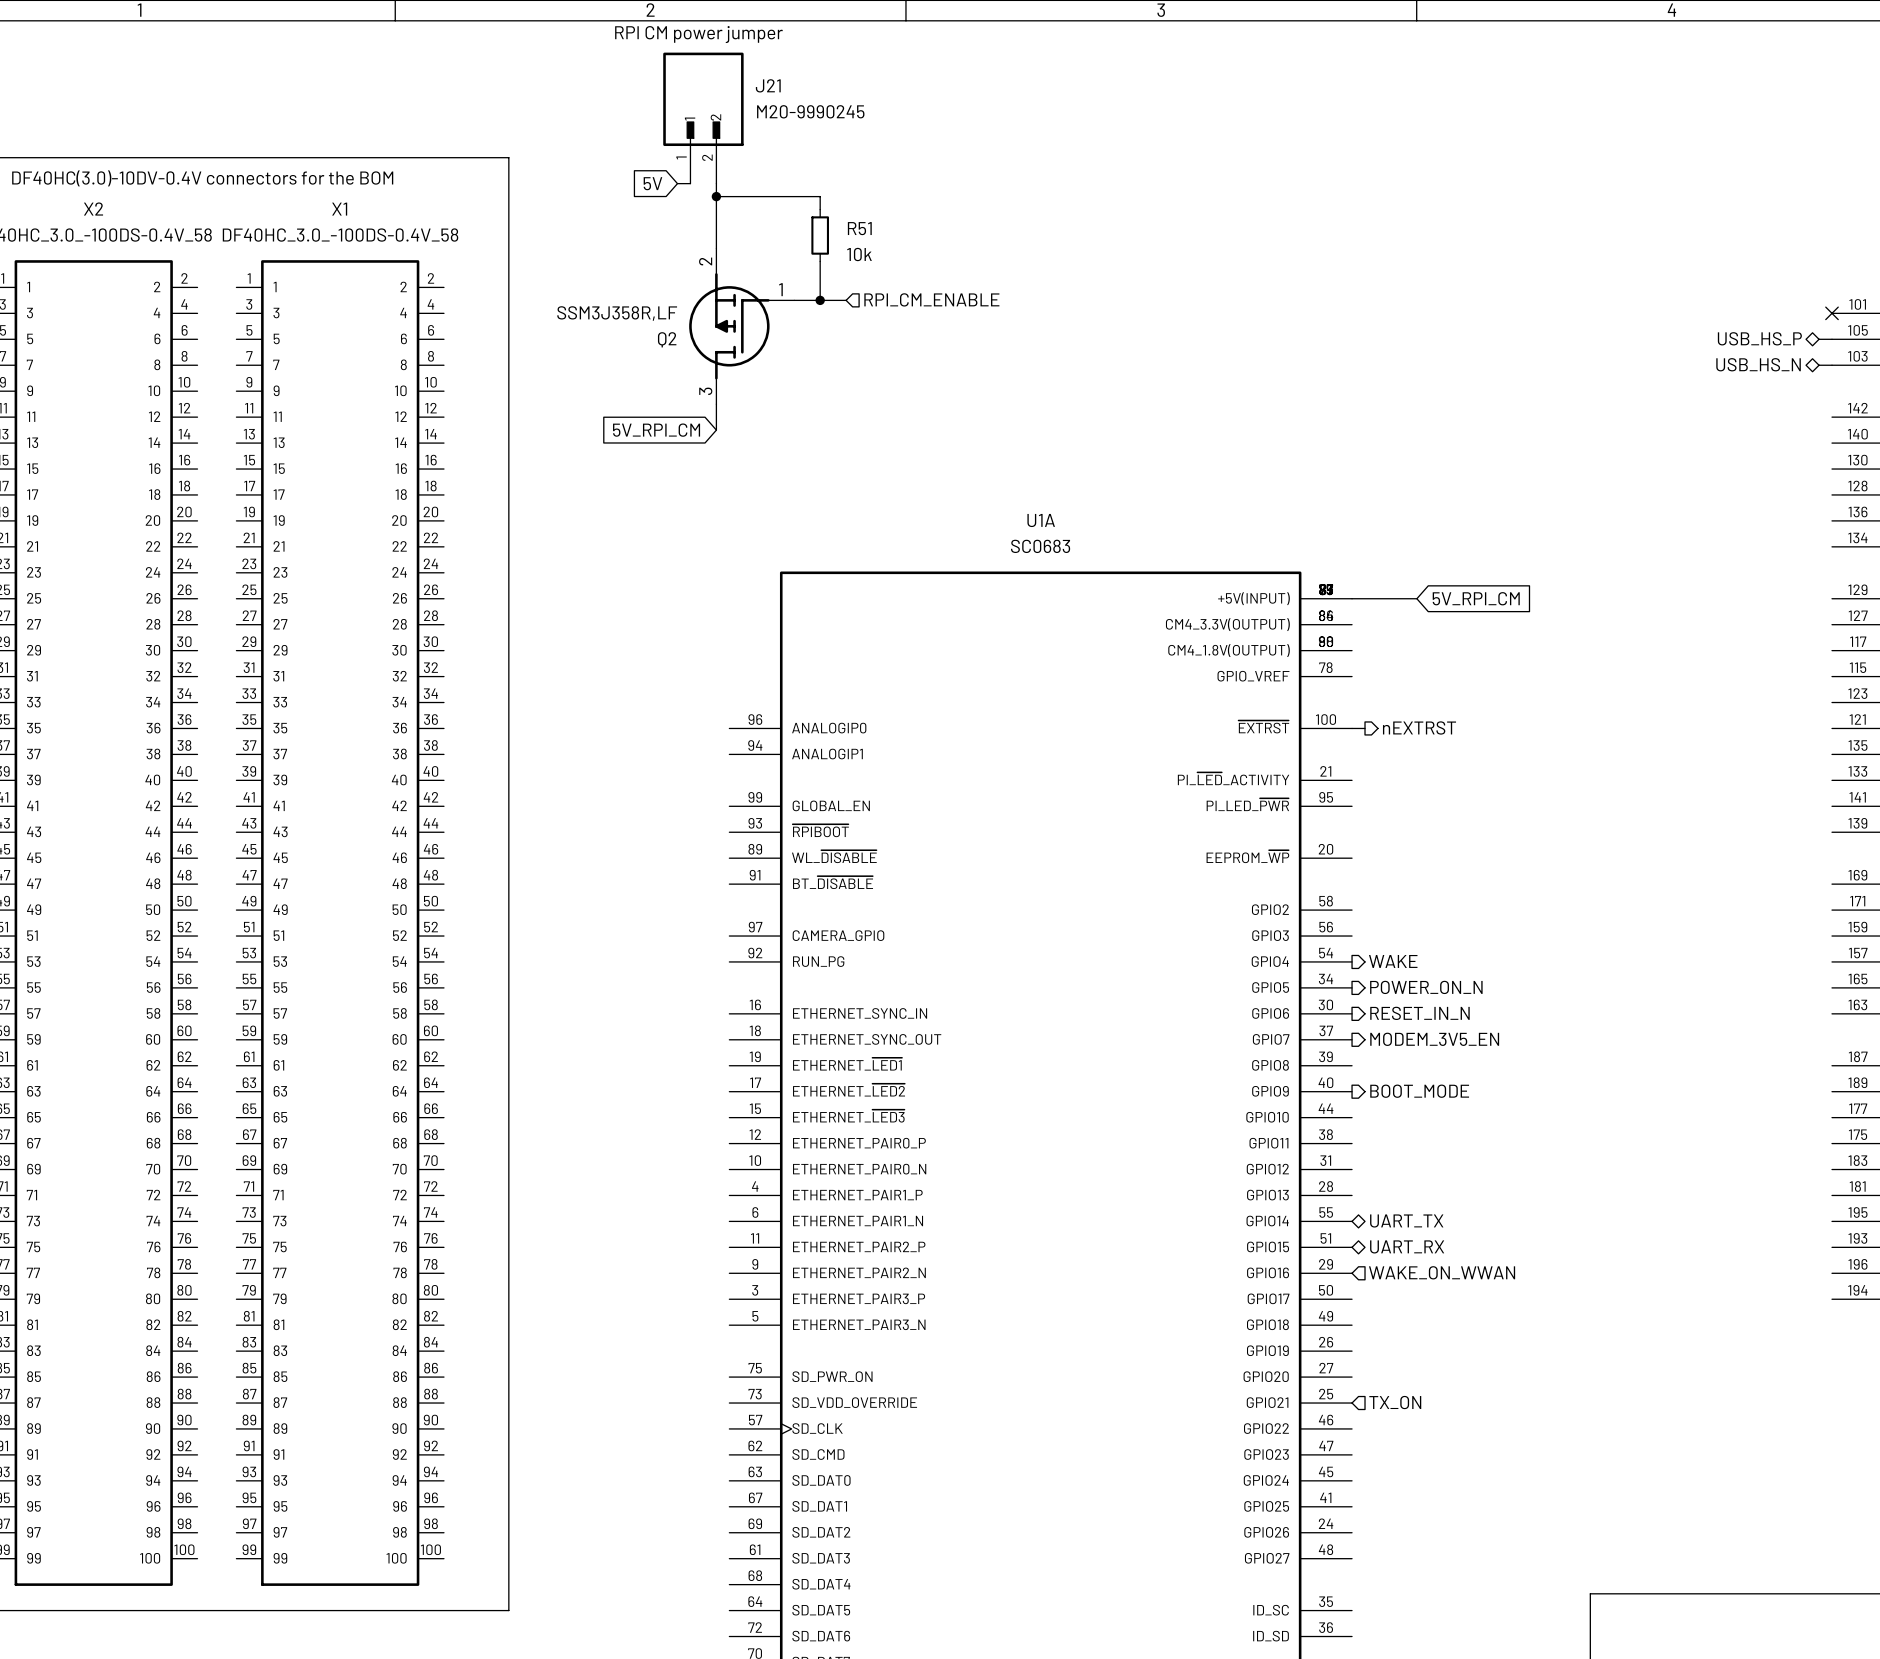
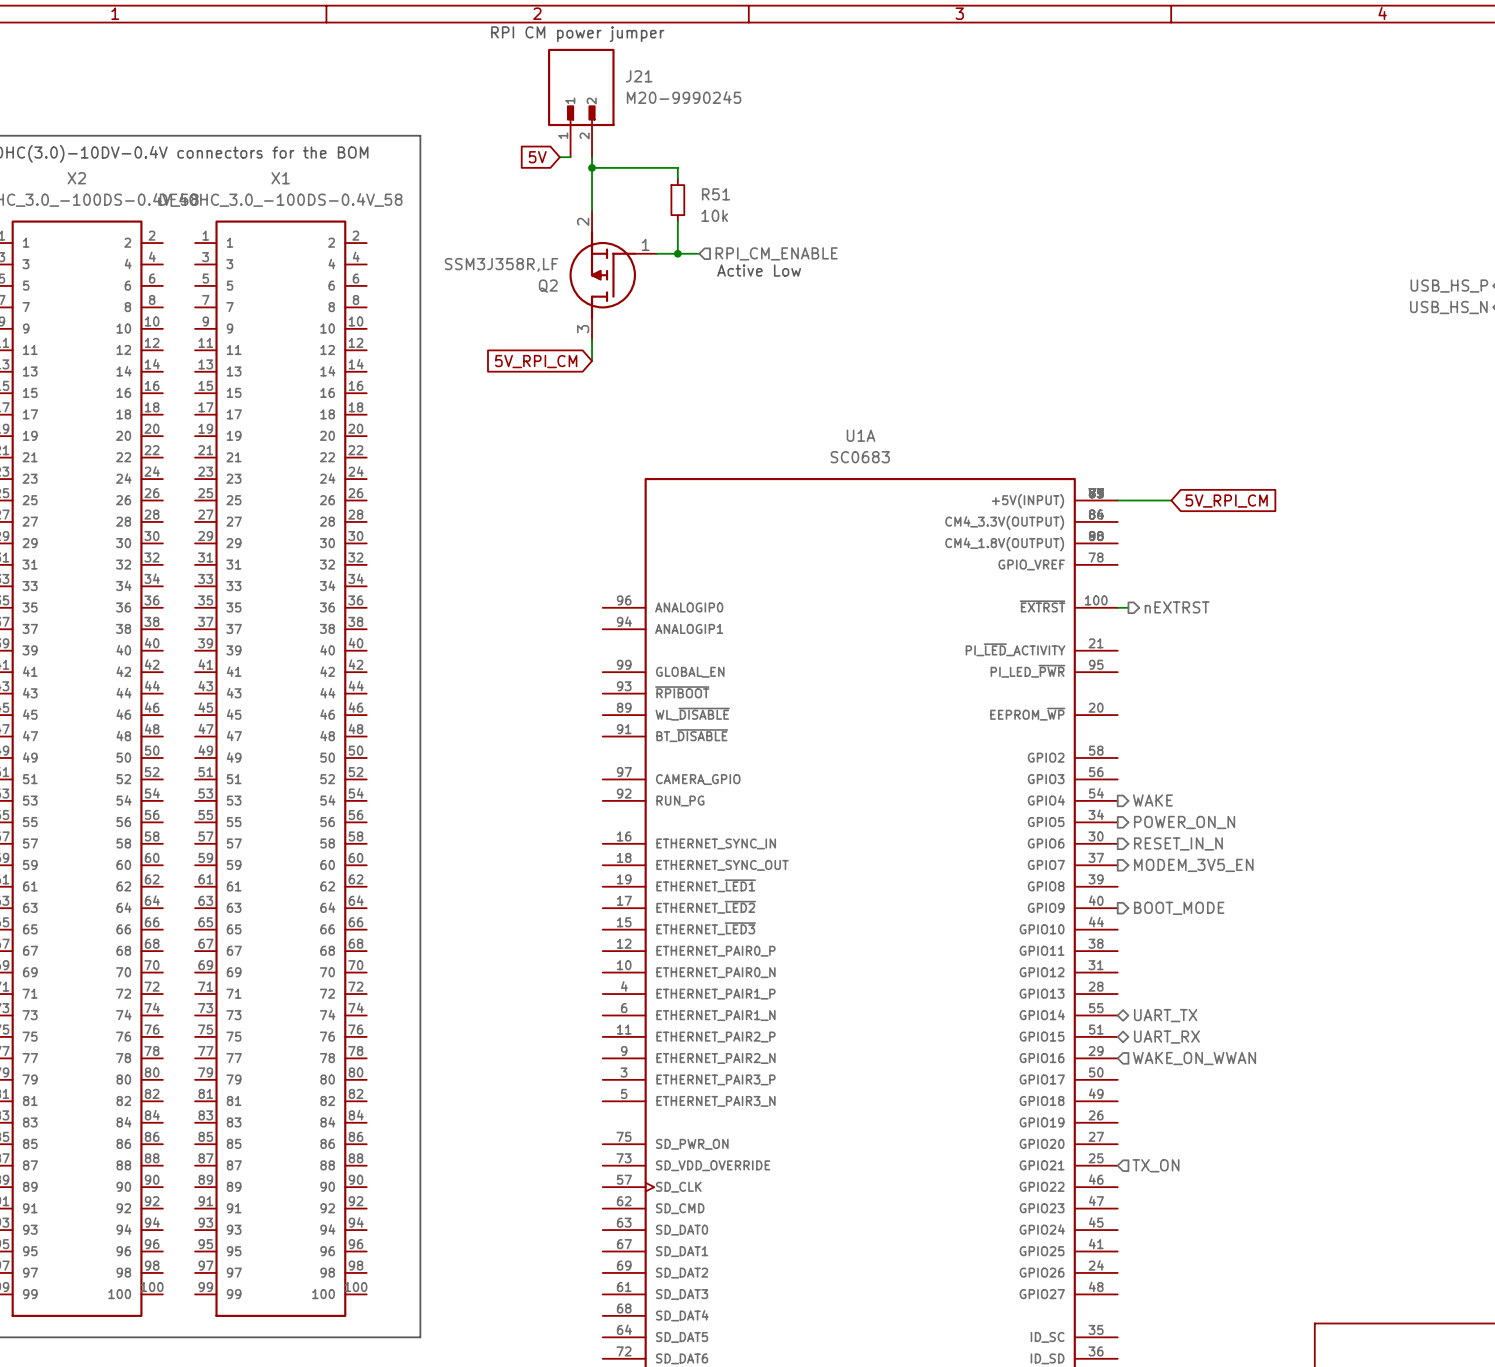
text: none -> Active Low (759, 270)

